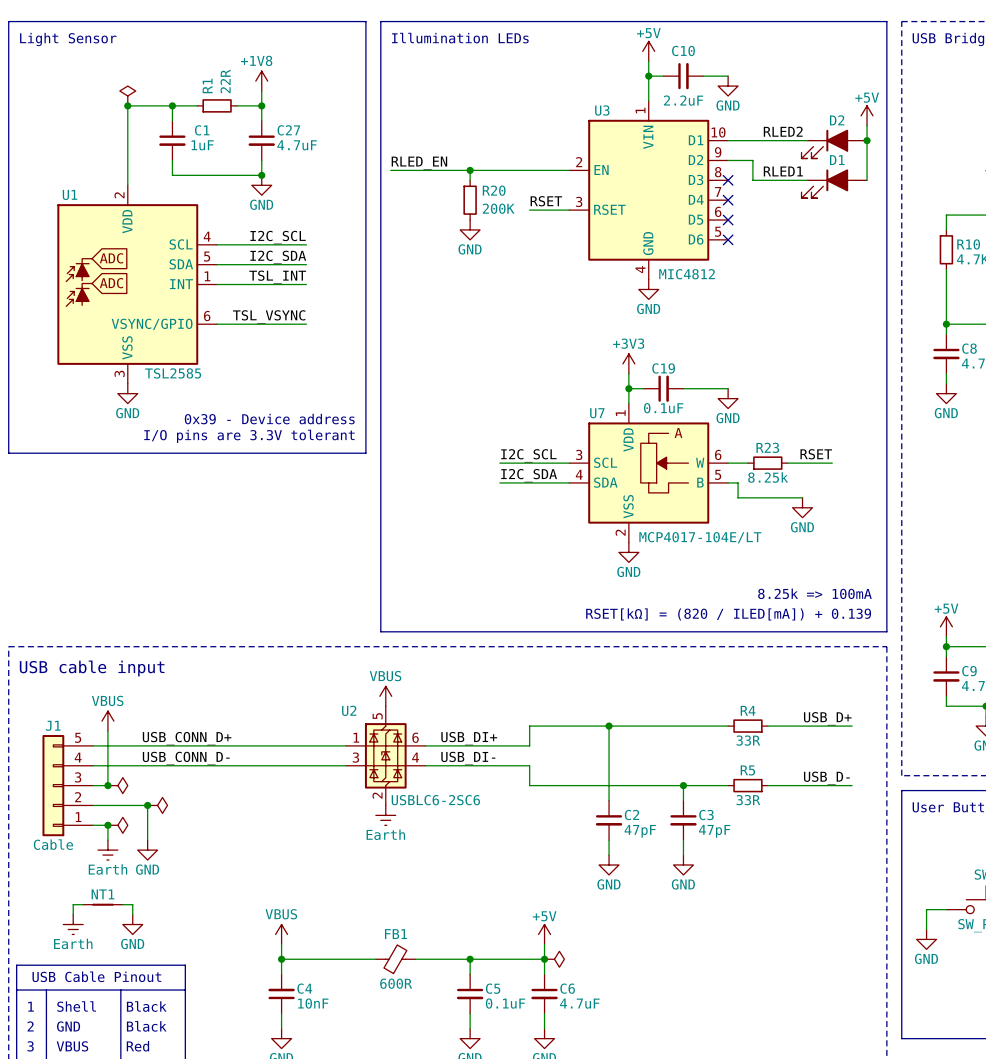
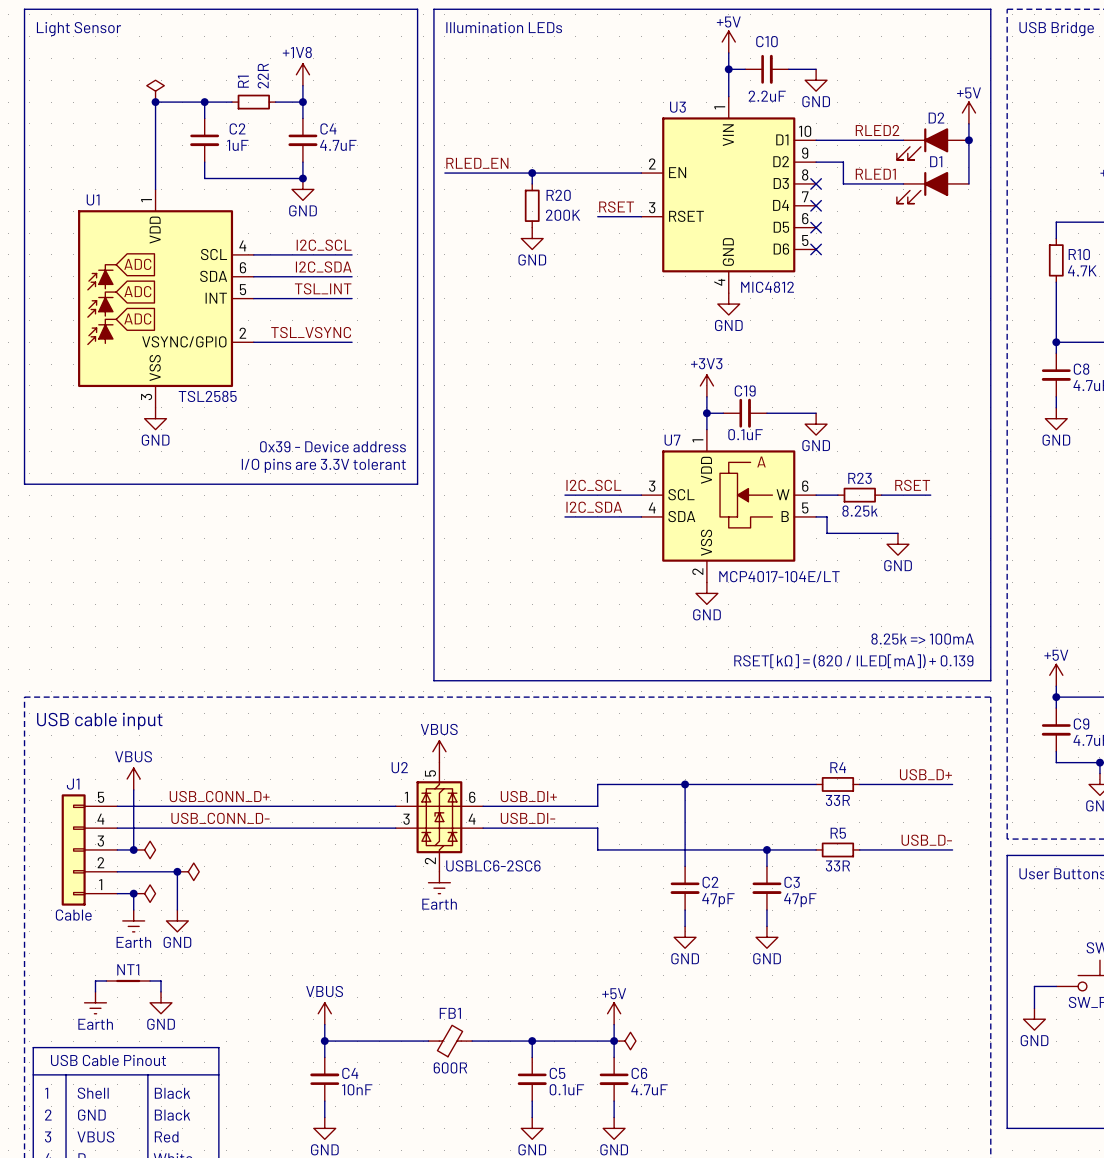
C1 name: C1 (202, 130) -> C2 (237, 128)
C27 name: C27 (288, 130) -> C4 (328, 128)
U1 symbol: [57, 185, 218, 384] -> [78, 189, 254, 408]

